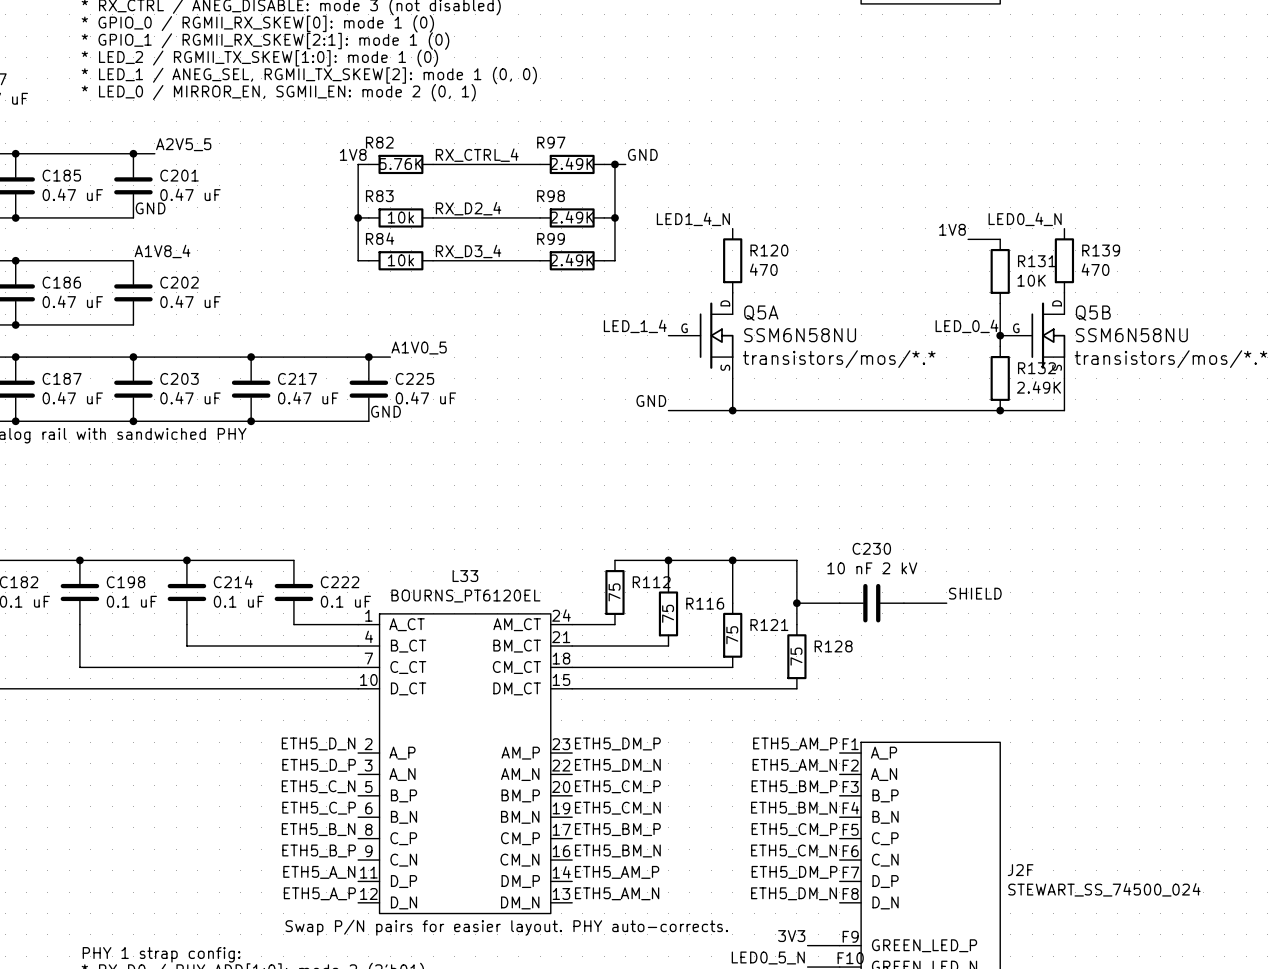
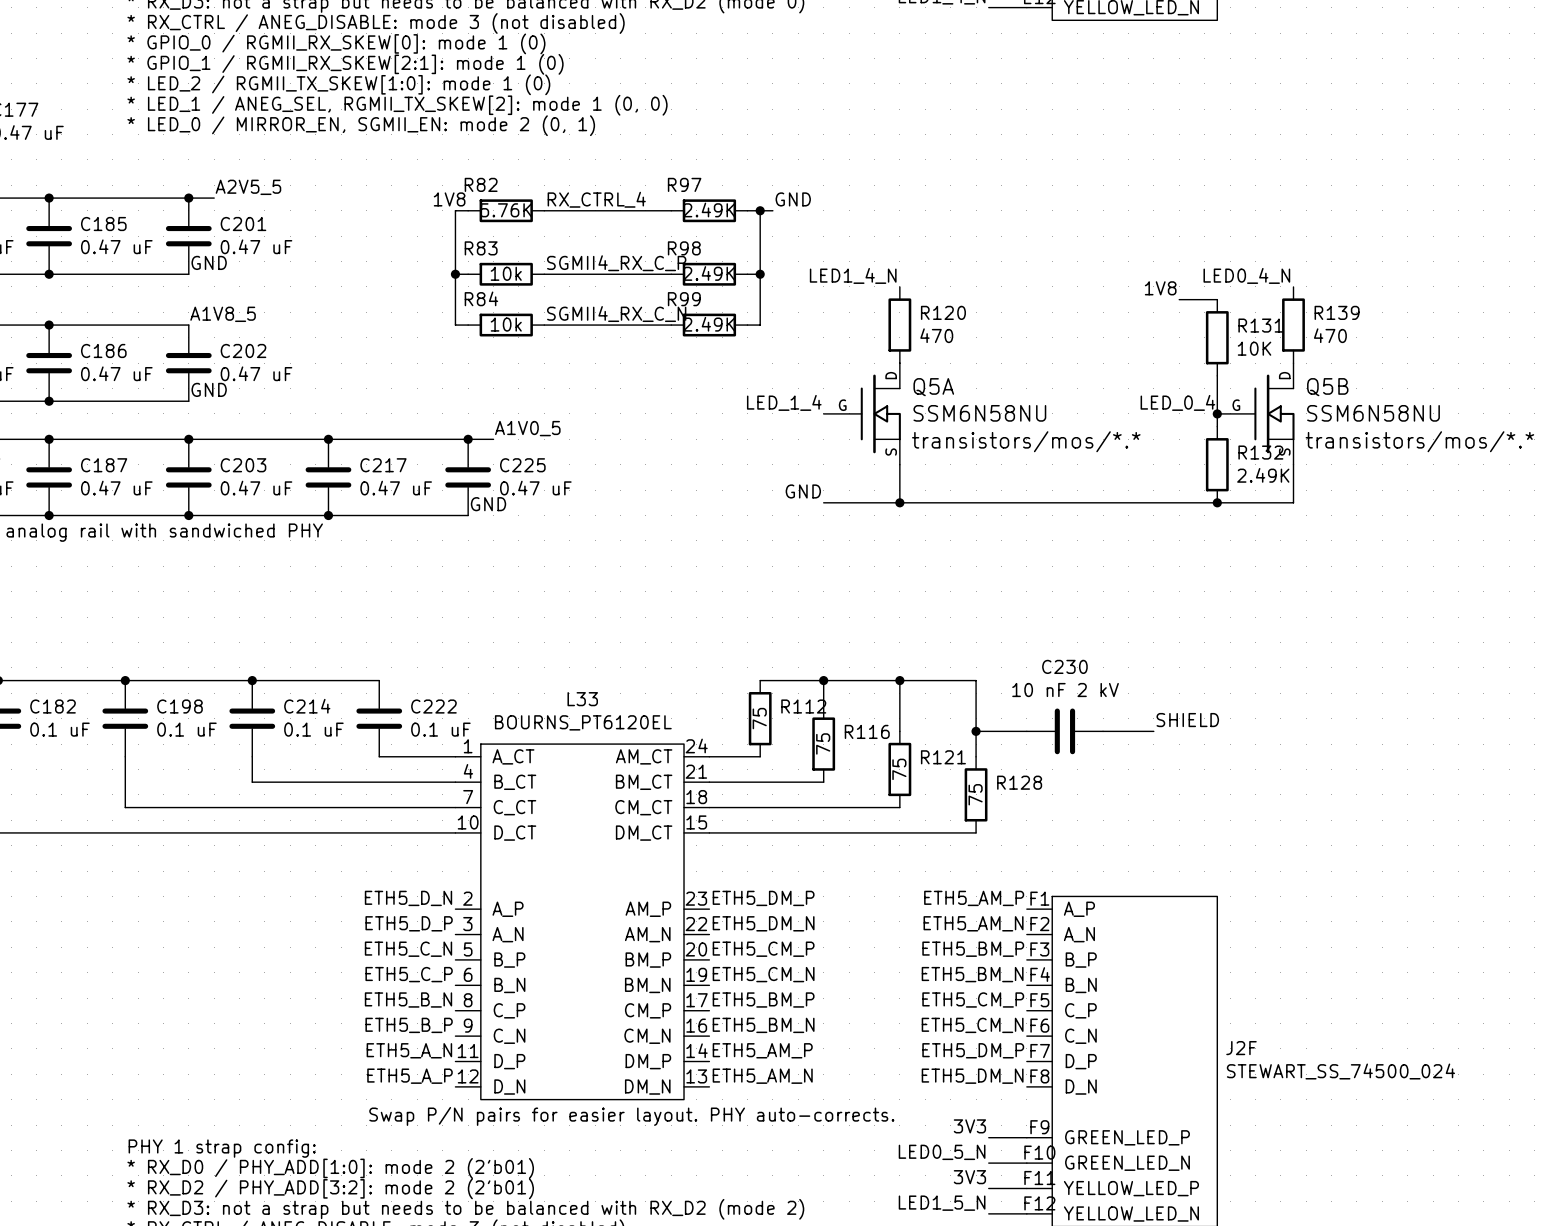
label: RX_D2_4 (468, 208) -> SGMII4_RX_C_P (616, 263)
label: A1V8_4 (162, 251) -> A1V8_5 (223, 314)
label: RX_D3_4 (468, 251) -> SGMII4_RX_C_N (616, 314)
label: none -> GND (209, 389)

